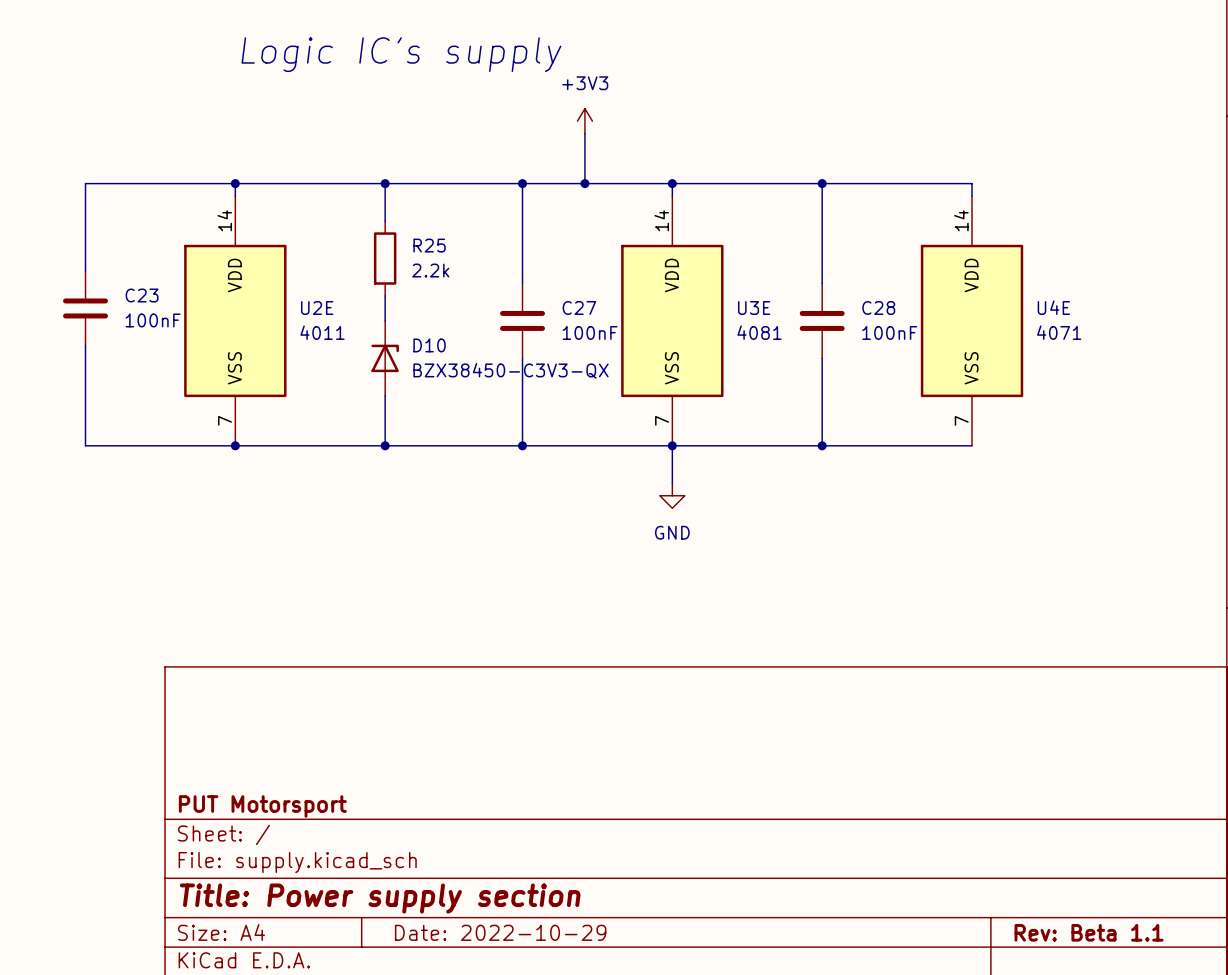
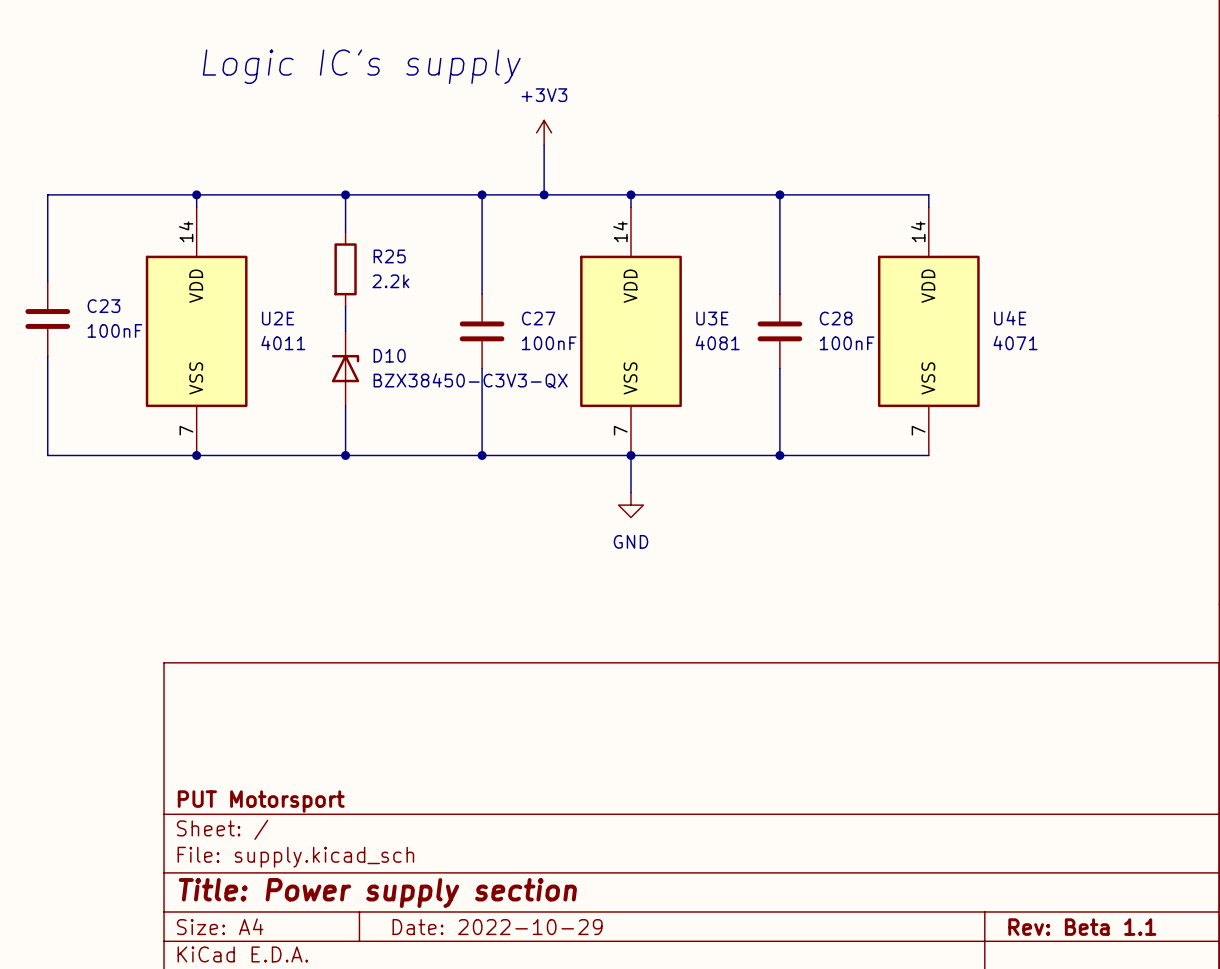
text position: Logic IC's supply (401, 54) -> Logic IC's supply (361, 66)
power symbol position: +3V3 (584, 121) -> +3V3 (544, 132)
wire: (584, 133) (584, 183) -> (544, 145) (544, 194)
wire: (235, 183) (235, 196) -> (196, 194) (196, 207)
junction position: (235, 183) -> (196, 194)
wire: (385, 183) (385, 221) -> (345, 194) (345, 232)
junction position: (385, 183) -> (345, 194)
wire: (522, 183) (522, 283) -> (482, 194) (482, 294)
junction: (522, 183) -> none
junction: (584, 183) -> none
wire: (672, 183) (672, 196) -> (630, 194) (630, 207)
junction: (672, 183) -> none
wire: (822, 183) (822, 283) -> (779, 194) (779, 294)
junction position: (822, 183) -> (779, 194)
junction: none -> (482, 194)
junction: none -> (544, 194)
junction: none -> (630, 194)
wire: (972, 196) (972, 183) (85, 183) (85, 271) -> (928, 207) (928, 194) (47, 194) (47, 281)
R25 position: (385, 258) -> (345, 269)
wire: (385, 295) (385, 320) -> (345, 306) (345, 331)
C23 position: (85, 308) -> (47, 318)
U2E position: (235, 320) -> (196, 331)
C27 position: (522, 320) -> (482, 331)
U3E position: (672, 320) -> (630, 331)
C28 position: (822, 320) -> (779, 331)
U4E position: (972, 320) -> (928, 331)
wire: (85, 345) (85, 445) (972, 445) -> (47, 356) (47, 455) (928, 455)
D10 position: (385, 358) -> (345, 368)
wire: (522, 358) (522, 445) -> (482, 368) (482, 455)
wire: (822, 358) (822, 445) -> (779, 368) (779, 455)
wire: (385, 395) (385, 445) -> (345, 405) (345, 455)
junction position: (235, 445) -> (196, 455)
junction position: (385, 445) -> (345, 455)
junction position: (522, 445) -> (482, 455)
wire: (672, 445) (672, 483) -> (630, 455) (630, 492)
junction position: (672, 445) -> (630, 455)
junction position: (822, 445) -> (779, 455)
power symbol position: GND (672, 495) -> GND (630, 505)

